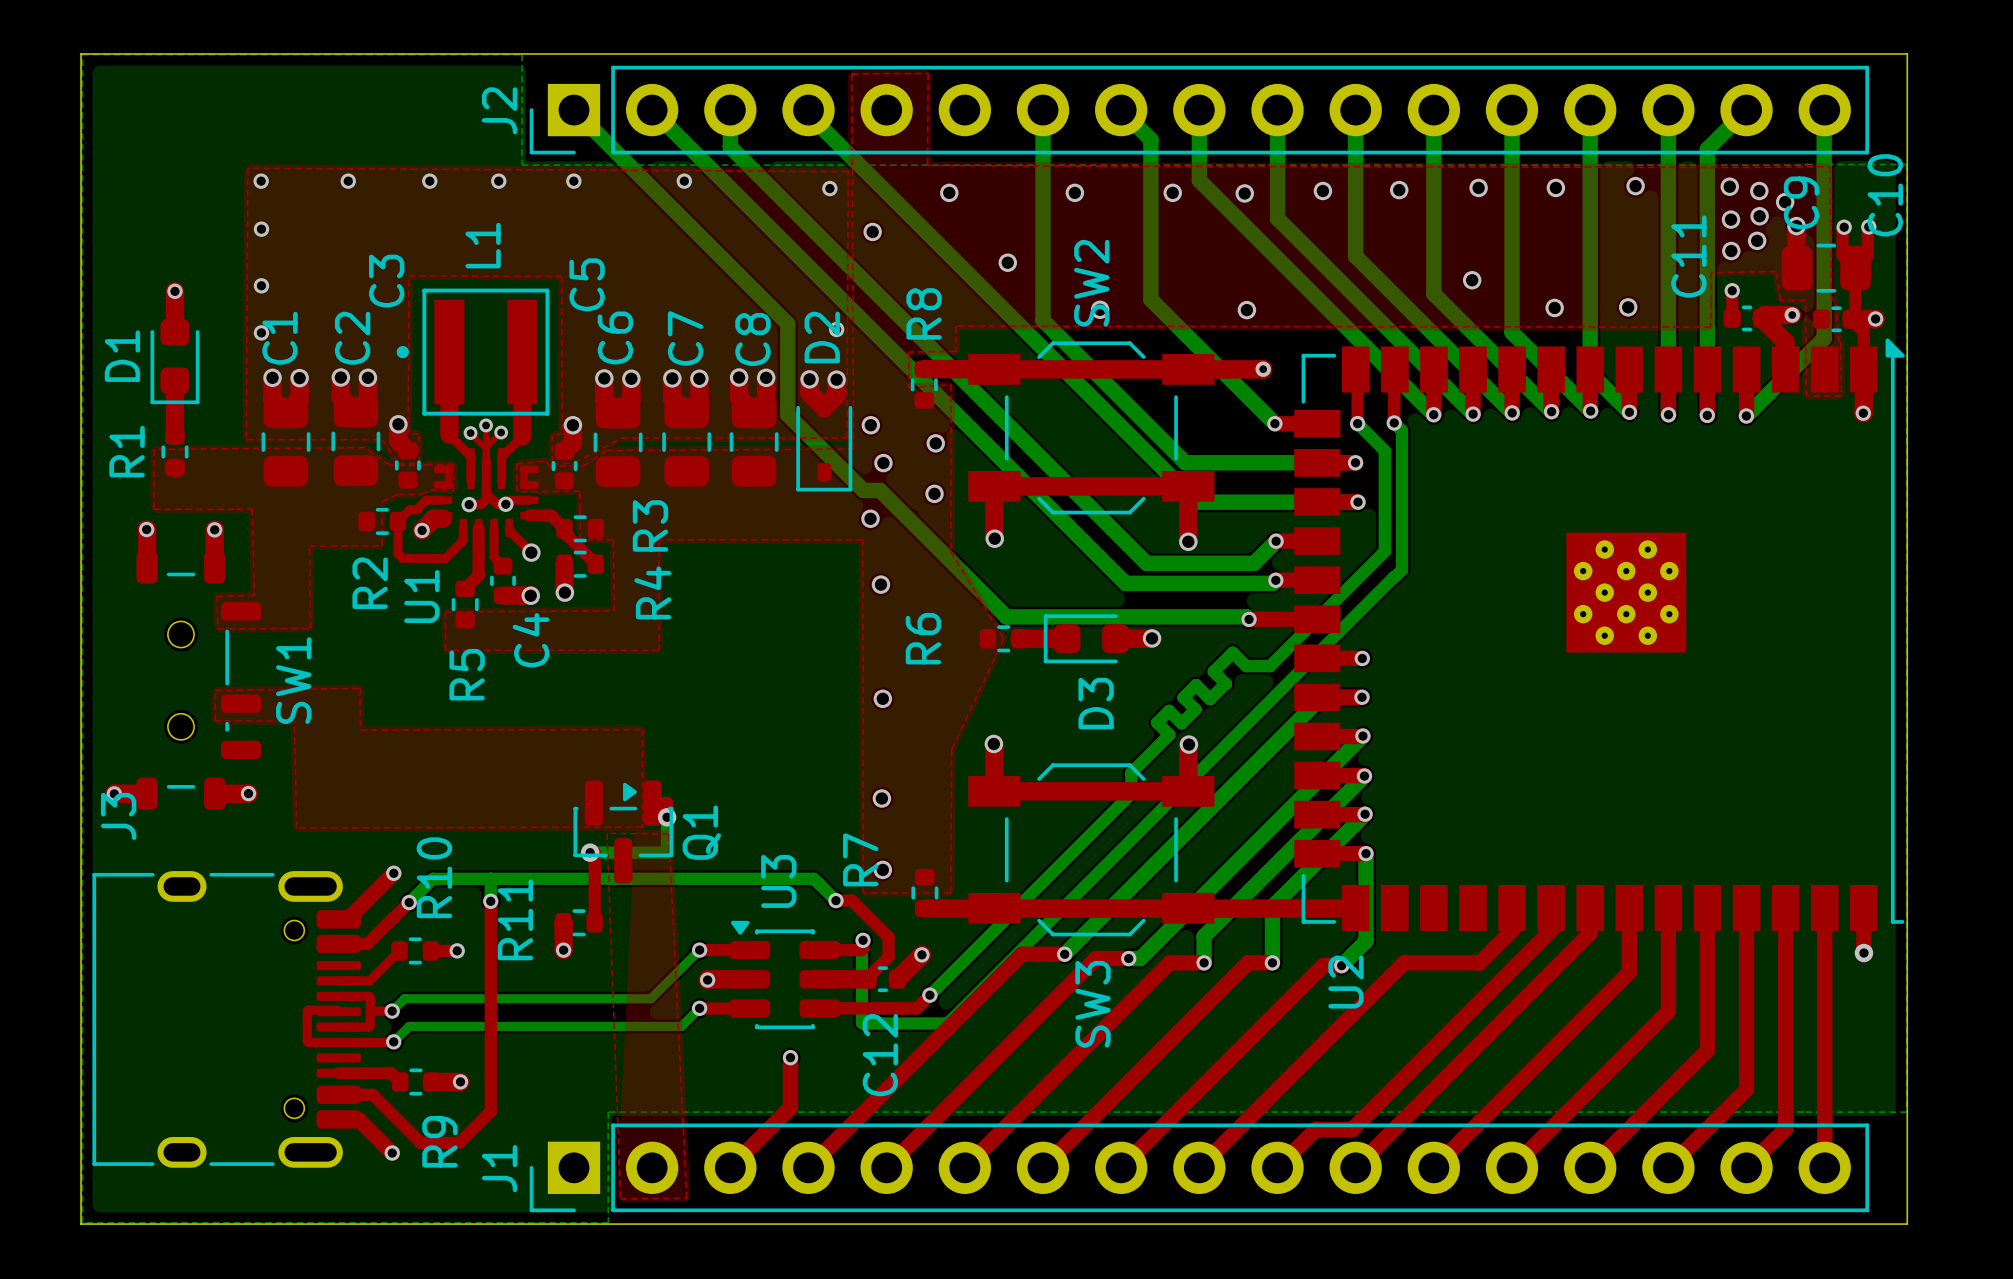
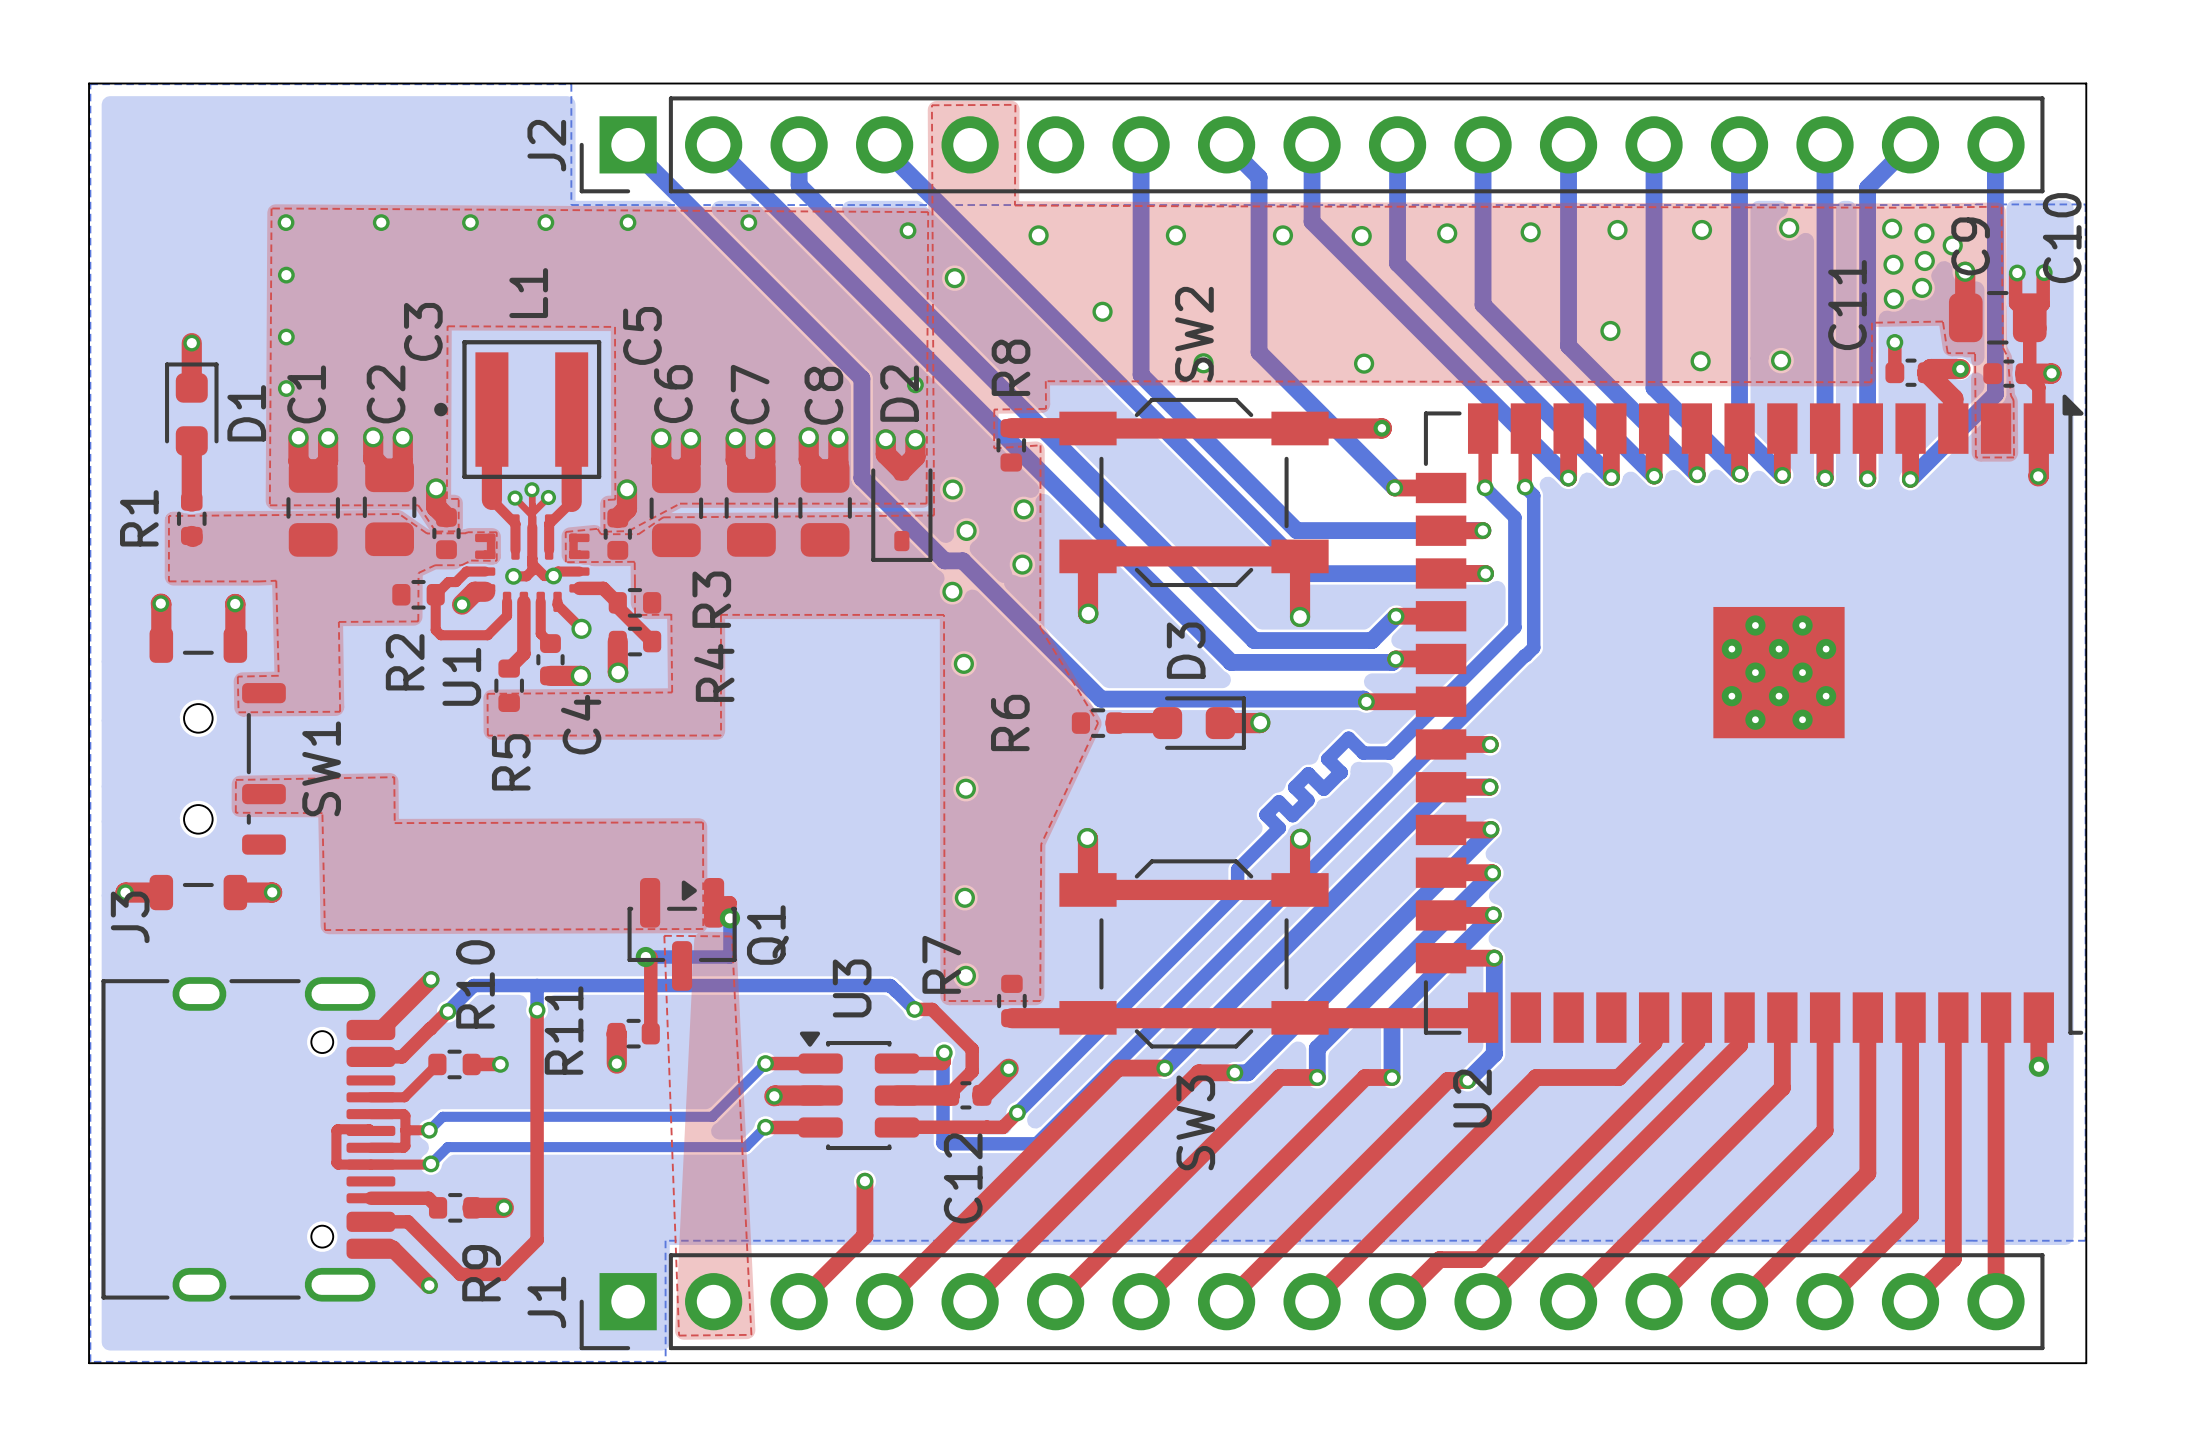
D1 rotation: 0° (174, 361) -> 180° (191, 409)
D3 rotation: 0° (1086, 638) -> 180° (1199, 723)

